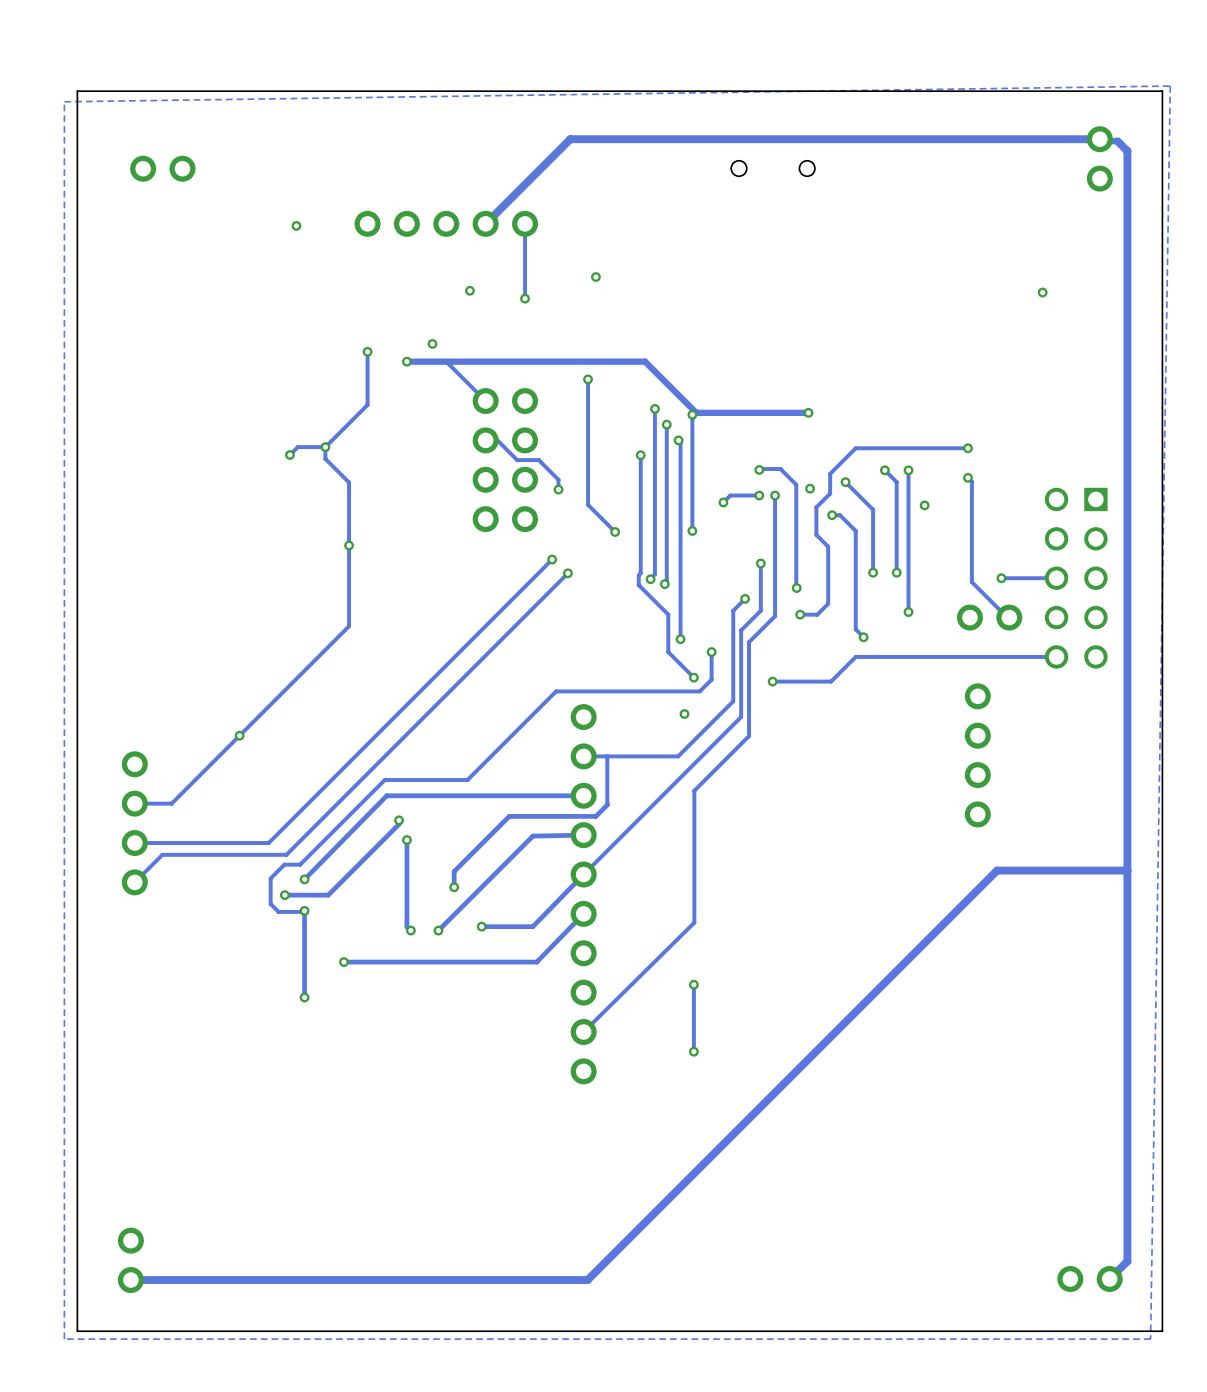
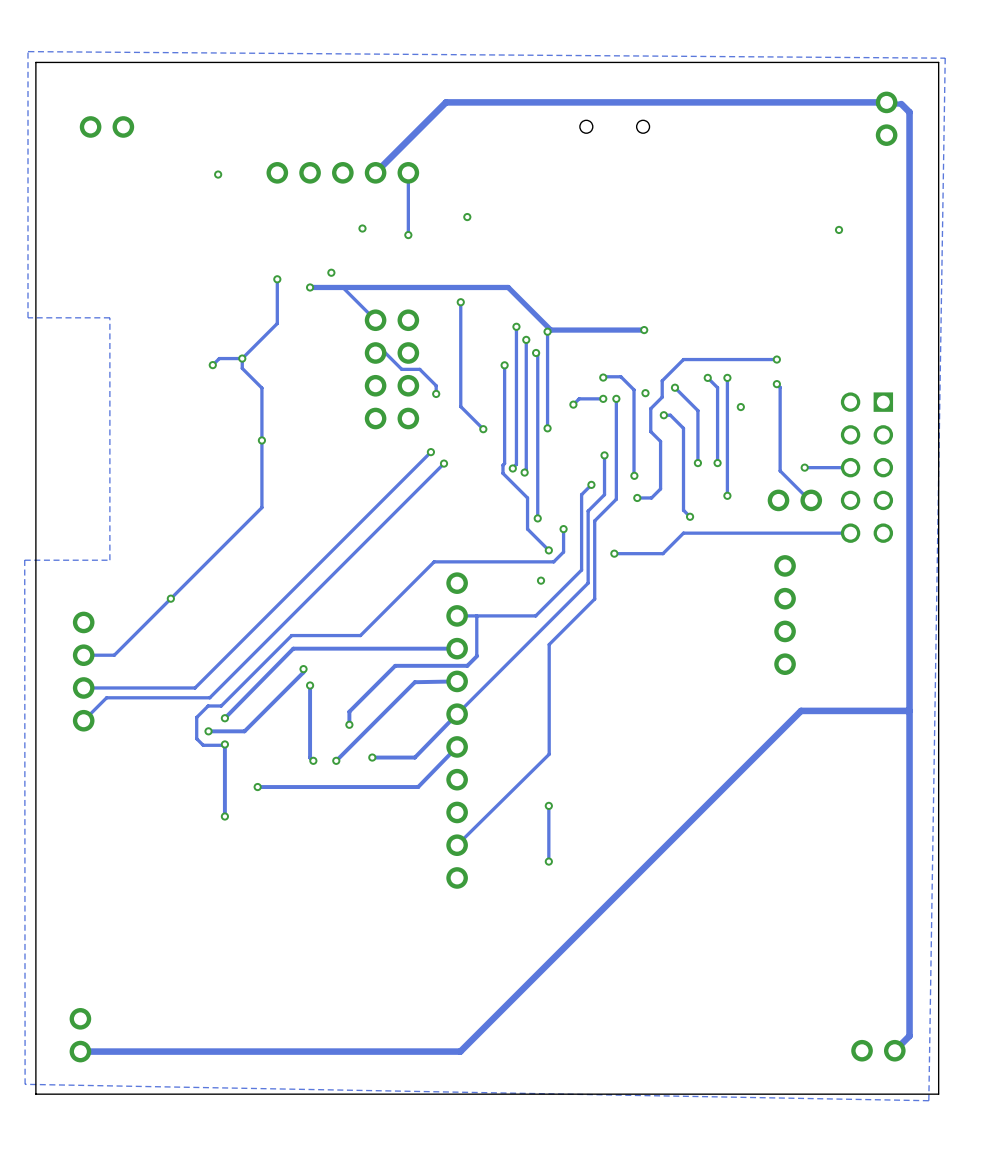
zone outline: (1170, 86) (64, 101) (64, 1339) (1150, 1339) -> (945, 58) (28, 51) (28, 317) (109, 317) (109, 560) (24, 560) (25, 1084) (928, 1100)

